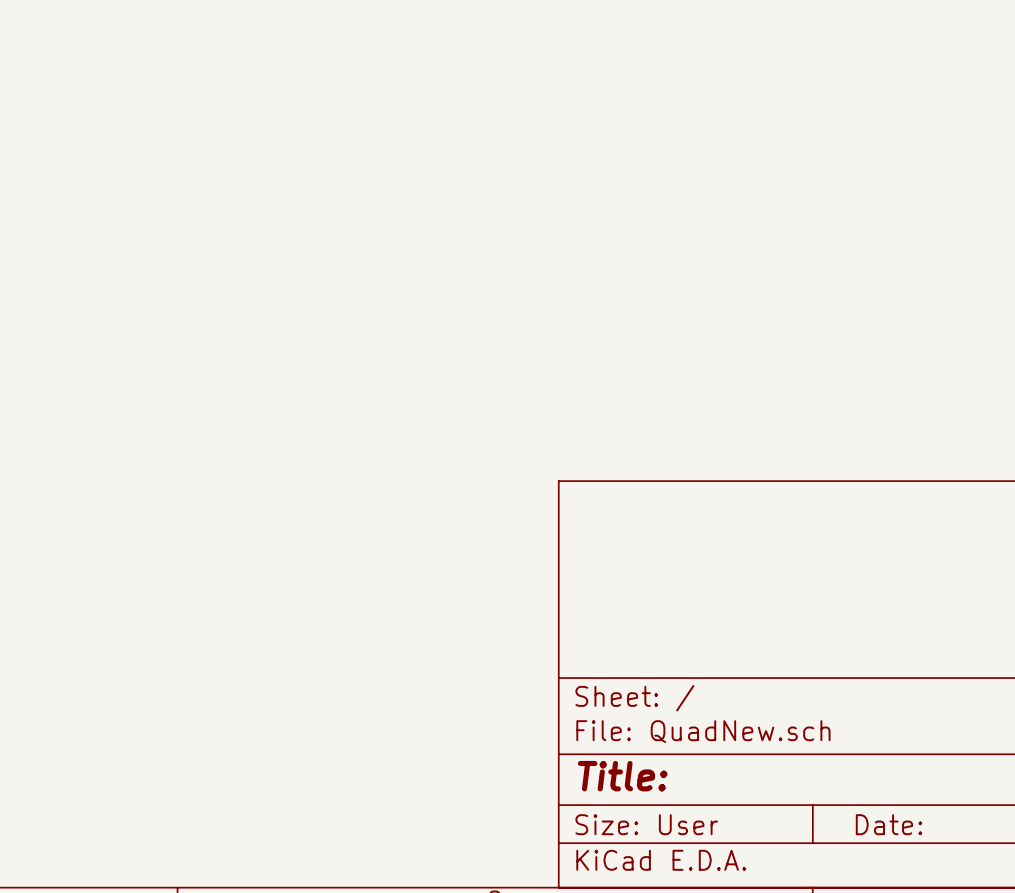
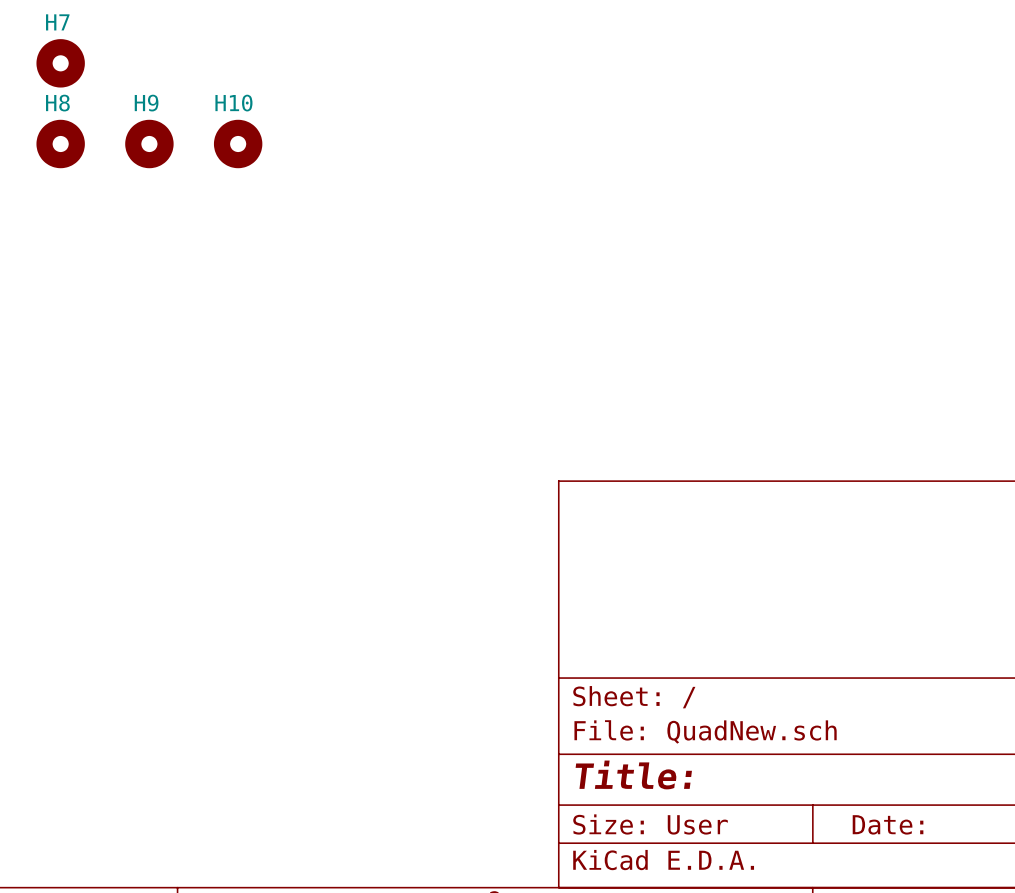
H7: none -> (60, 63)
H8: none -> (60, 144)
H9: none -> (149, 144)
H10: none -> (238, 144)

